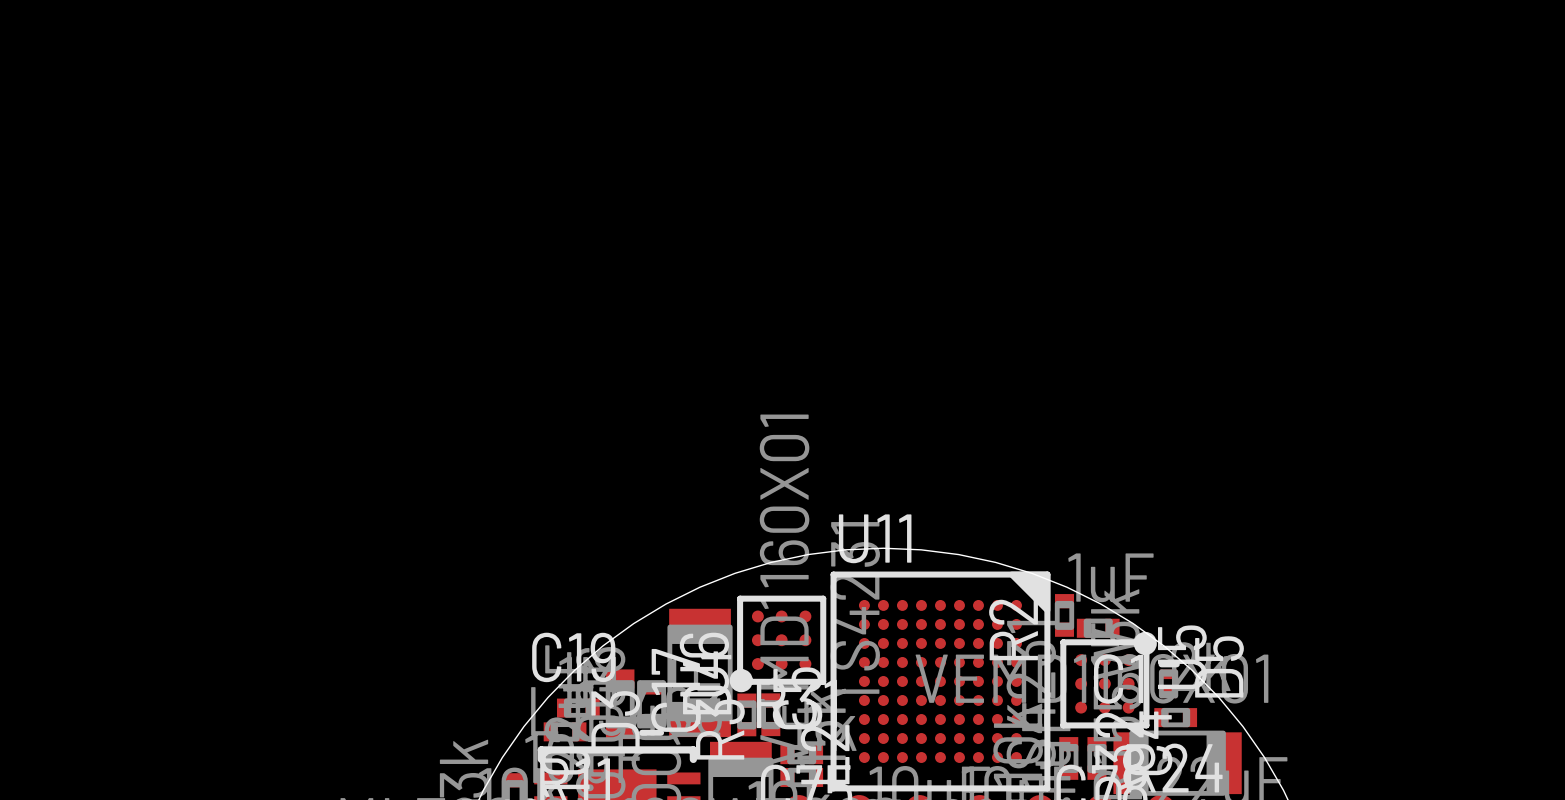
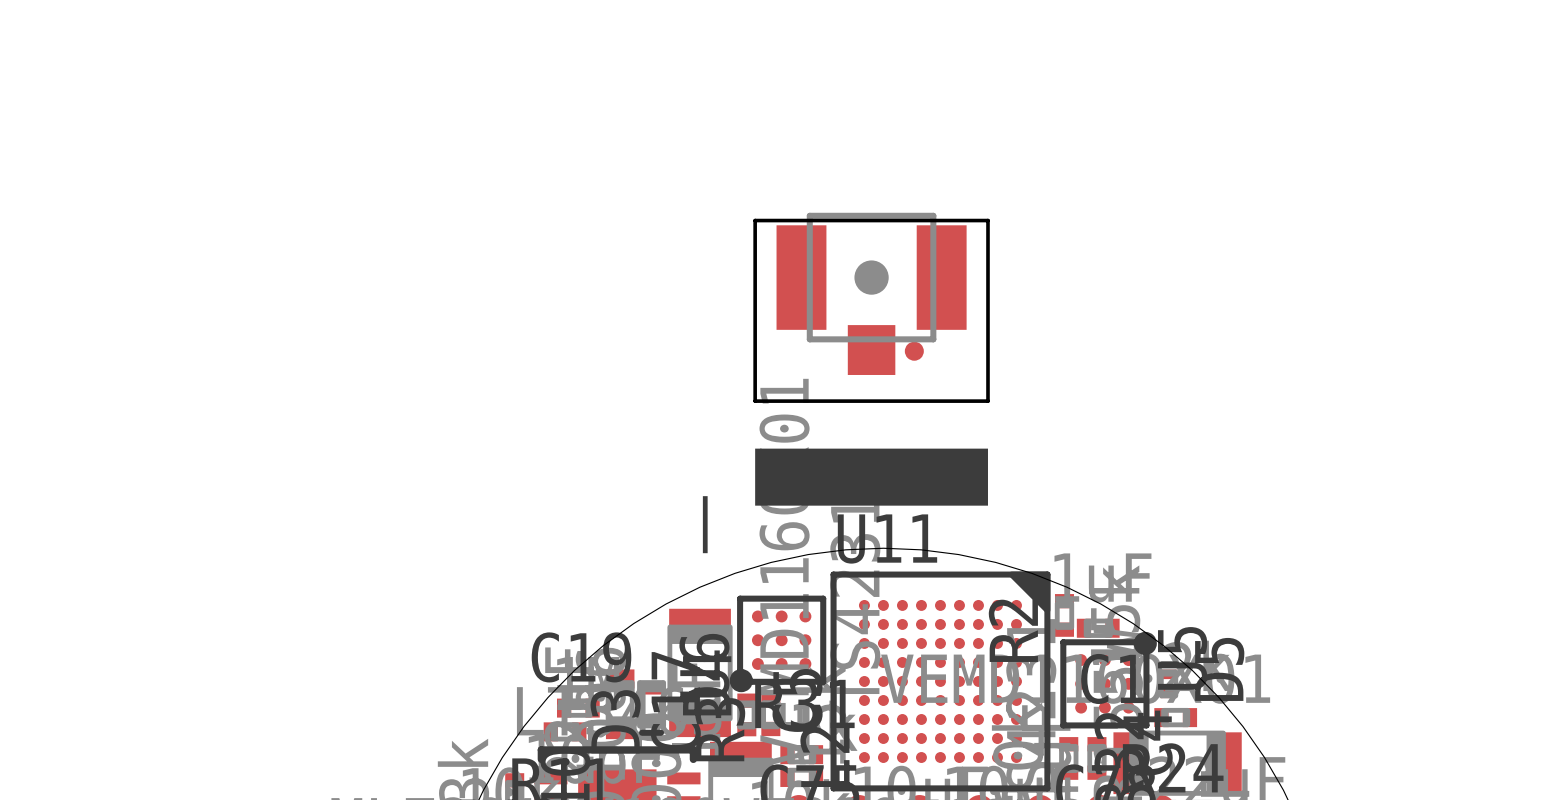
board edge: none -> (755, 220) (987, 220) (987, 401) (755, 401) (755, 220)
part: none -> (871, 293)
part: none -> (914, 351)
drawing: none -> [702, 448, 988, 554]

